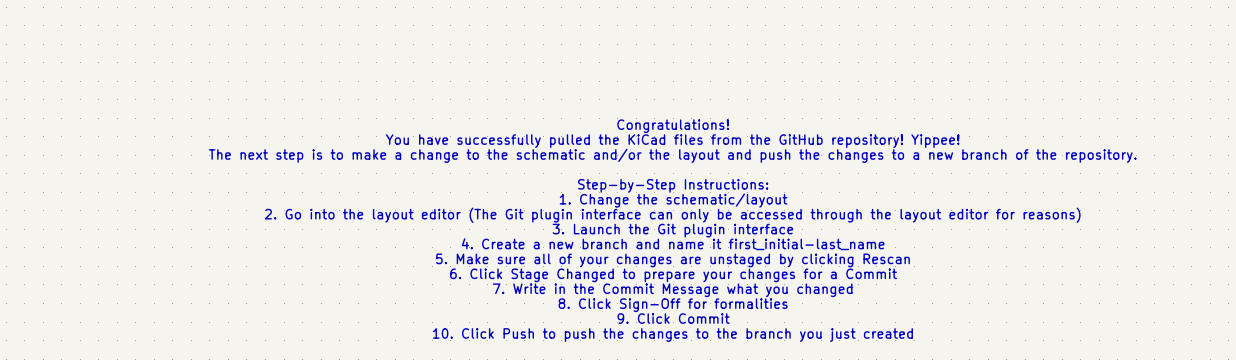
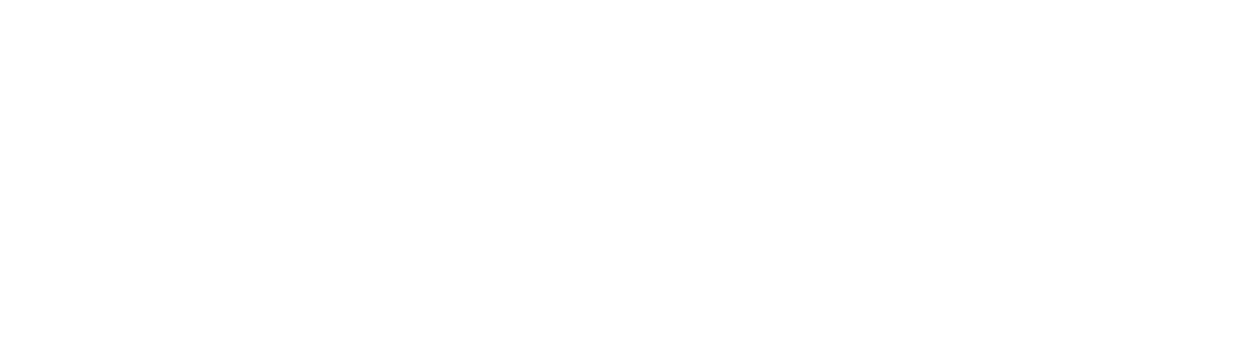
text: Congratulations! (673, 126) -> none
text: You have successfully pulled the KiCad files from the GitHub repository! Yippee! (672, 141) -> none
text: The next step is to make a change to the schematic and/or the layout and push the changes to a new branch of the repository. (672, 155) -> none
text: Step-by-Step Instructions: (673, 185) -> none
text: 1. Change the schematic/layout (673, 200) -> none
text: 2. Go into the layout editor (The Git plugin interface can only be accessed through the layout editor for reasons) (672, 215) -> none
text: 3. Launch the Git plugin interface (672, 230) -> none
text: 4. Create a new branch and name it first_initial-last_name (673, 244) -> none
text: 5. Make sure all of your changes are unstaged by clicking Rescan (672, 260) -> none
text: 6. Click Stage Changed to prepare your changes for a Commit (673, 275) -> none
text: 7. Write in the Commit Message what you changed (672, 290) -> none
text: 8. Click Sign-Off for formalities (673, 305) -> none
text: 9. Click Commit (673, 318) -> none
text: 10. Click Push to push the changes to the branch you just created (672, 335) -> none

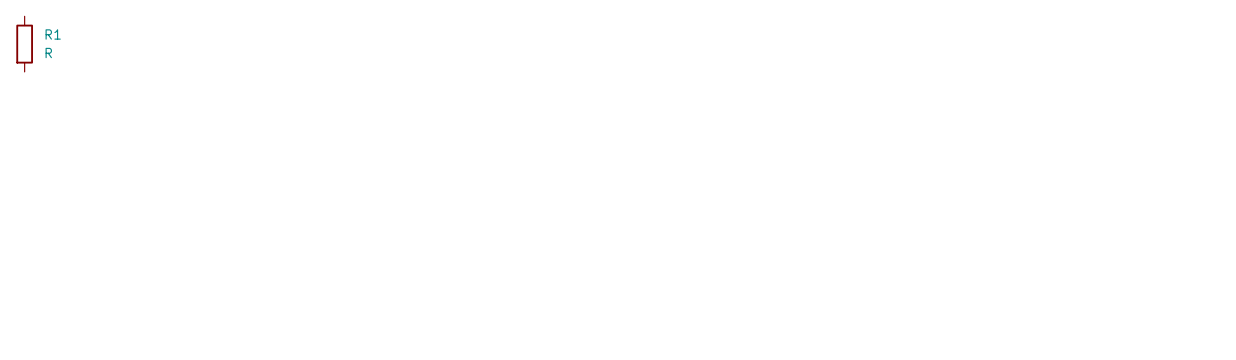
R1: none -> R (24, 44)

